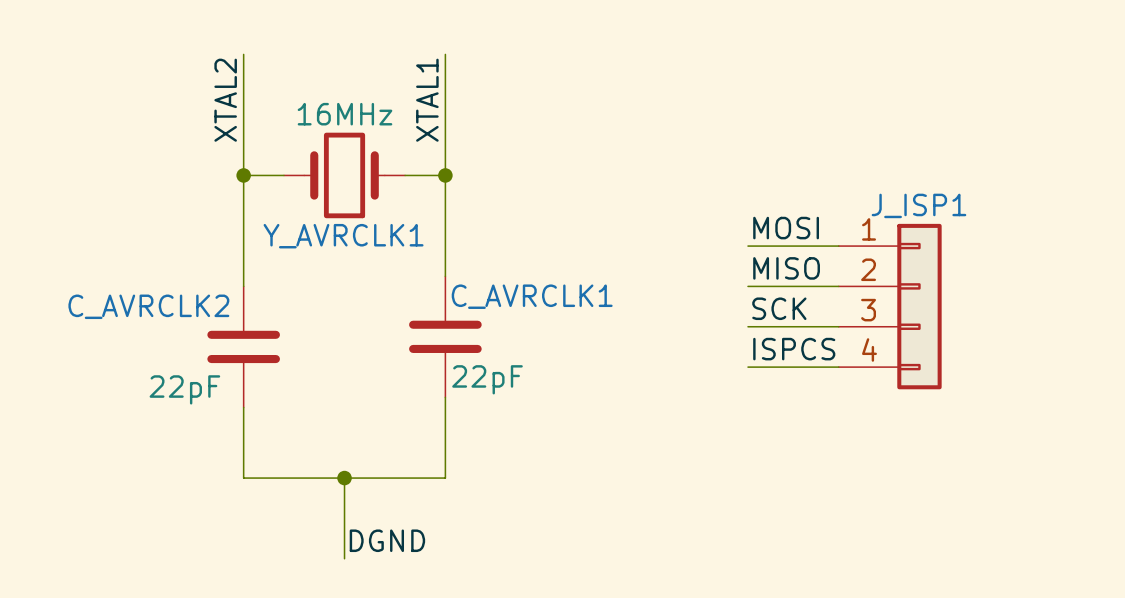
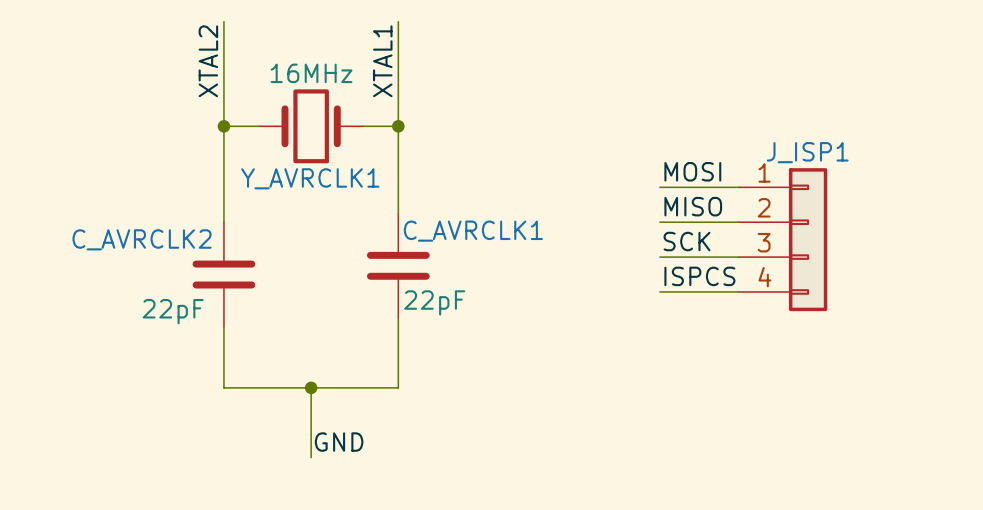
label: DGND (387, 540) -> GND (339, 442)

